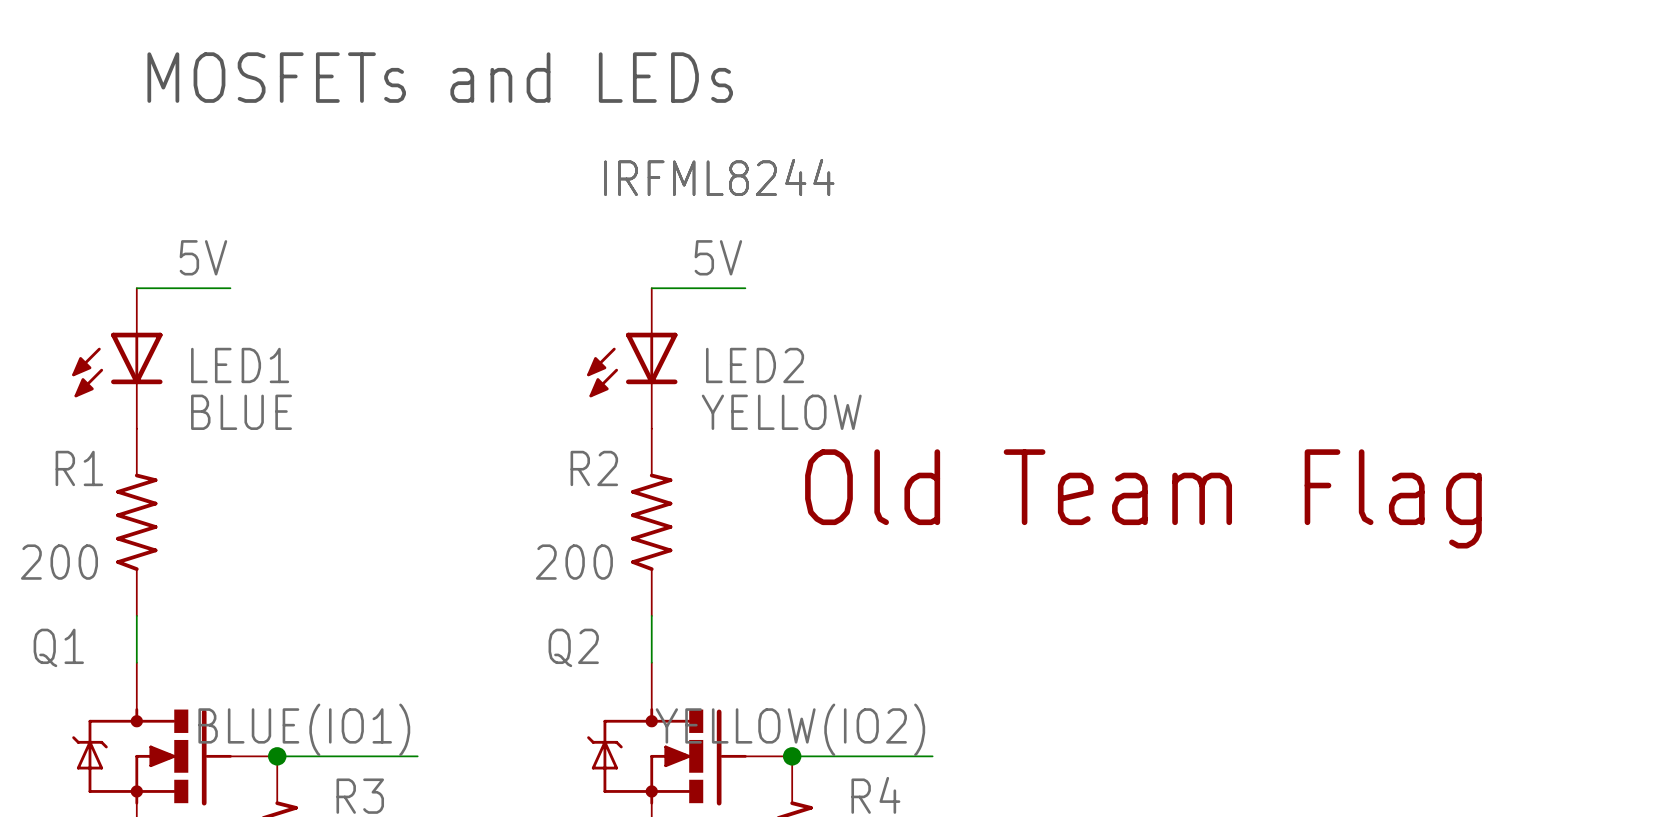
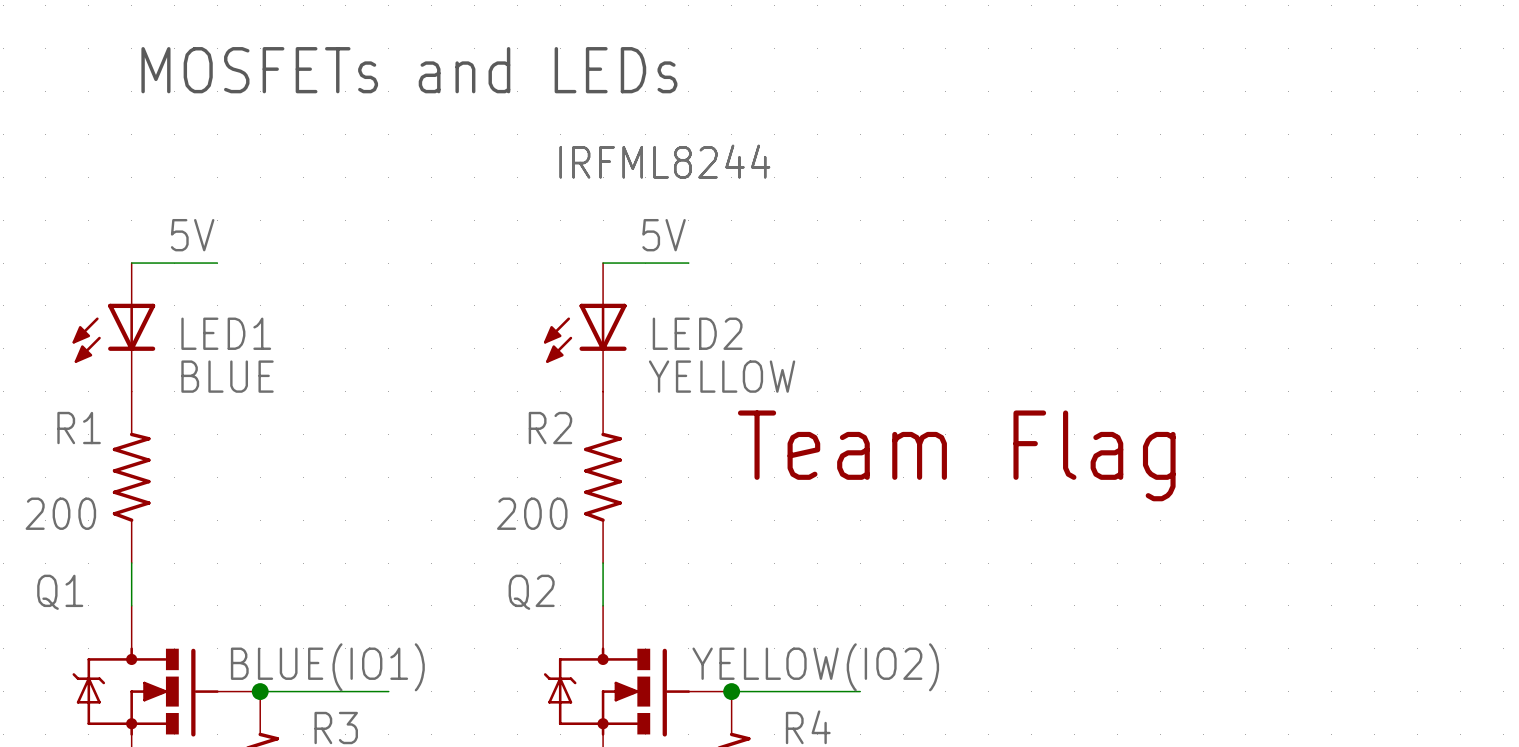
text: Old Team Flag (1143, 498) -> Team Flag (956, 455)
label position: BLUE(IO1) (304, 729) -> BLUE(IO1) (327, 667)
label position: YELLOW(IO2) (790, 729) -> YELLOW(IO2) (815, 667)

